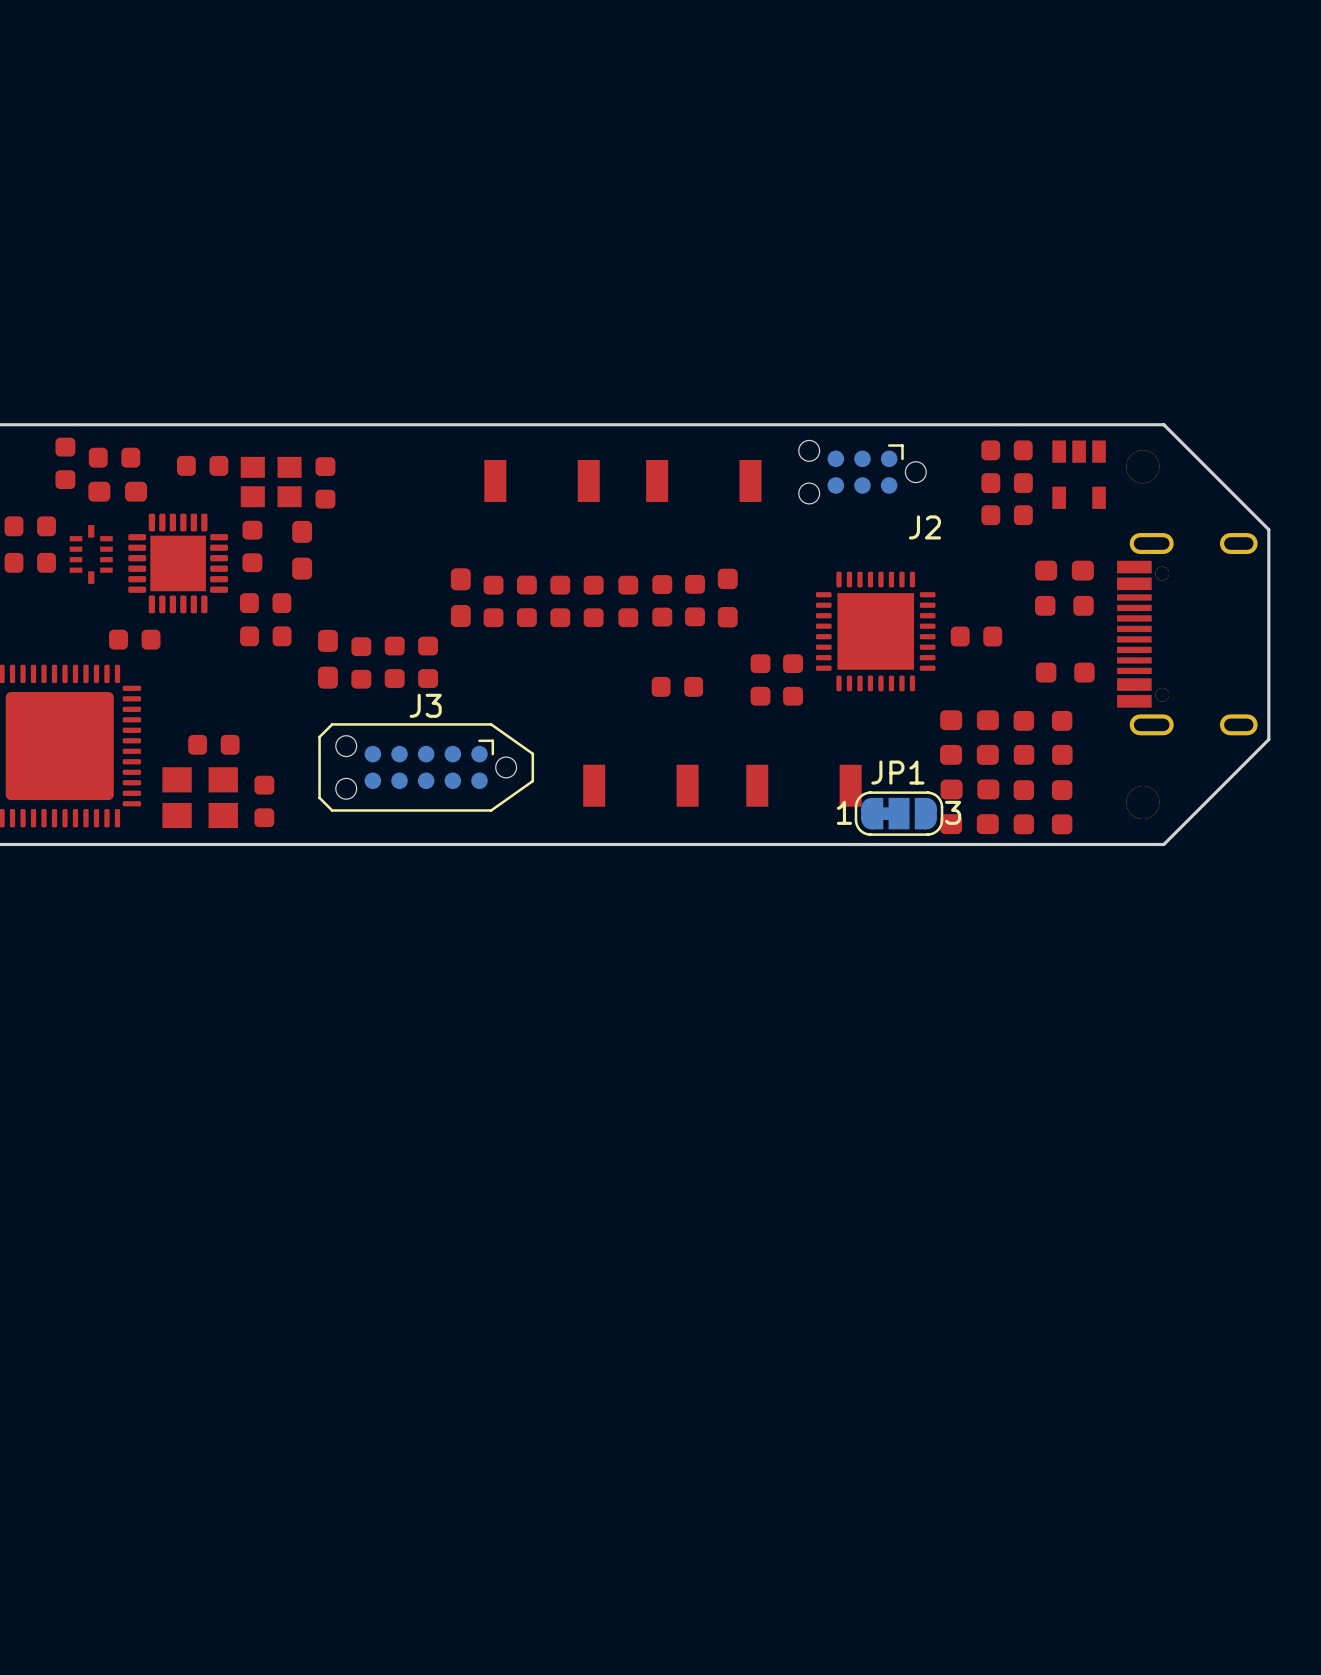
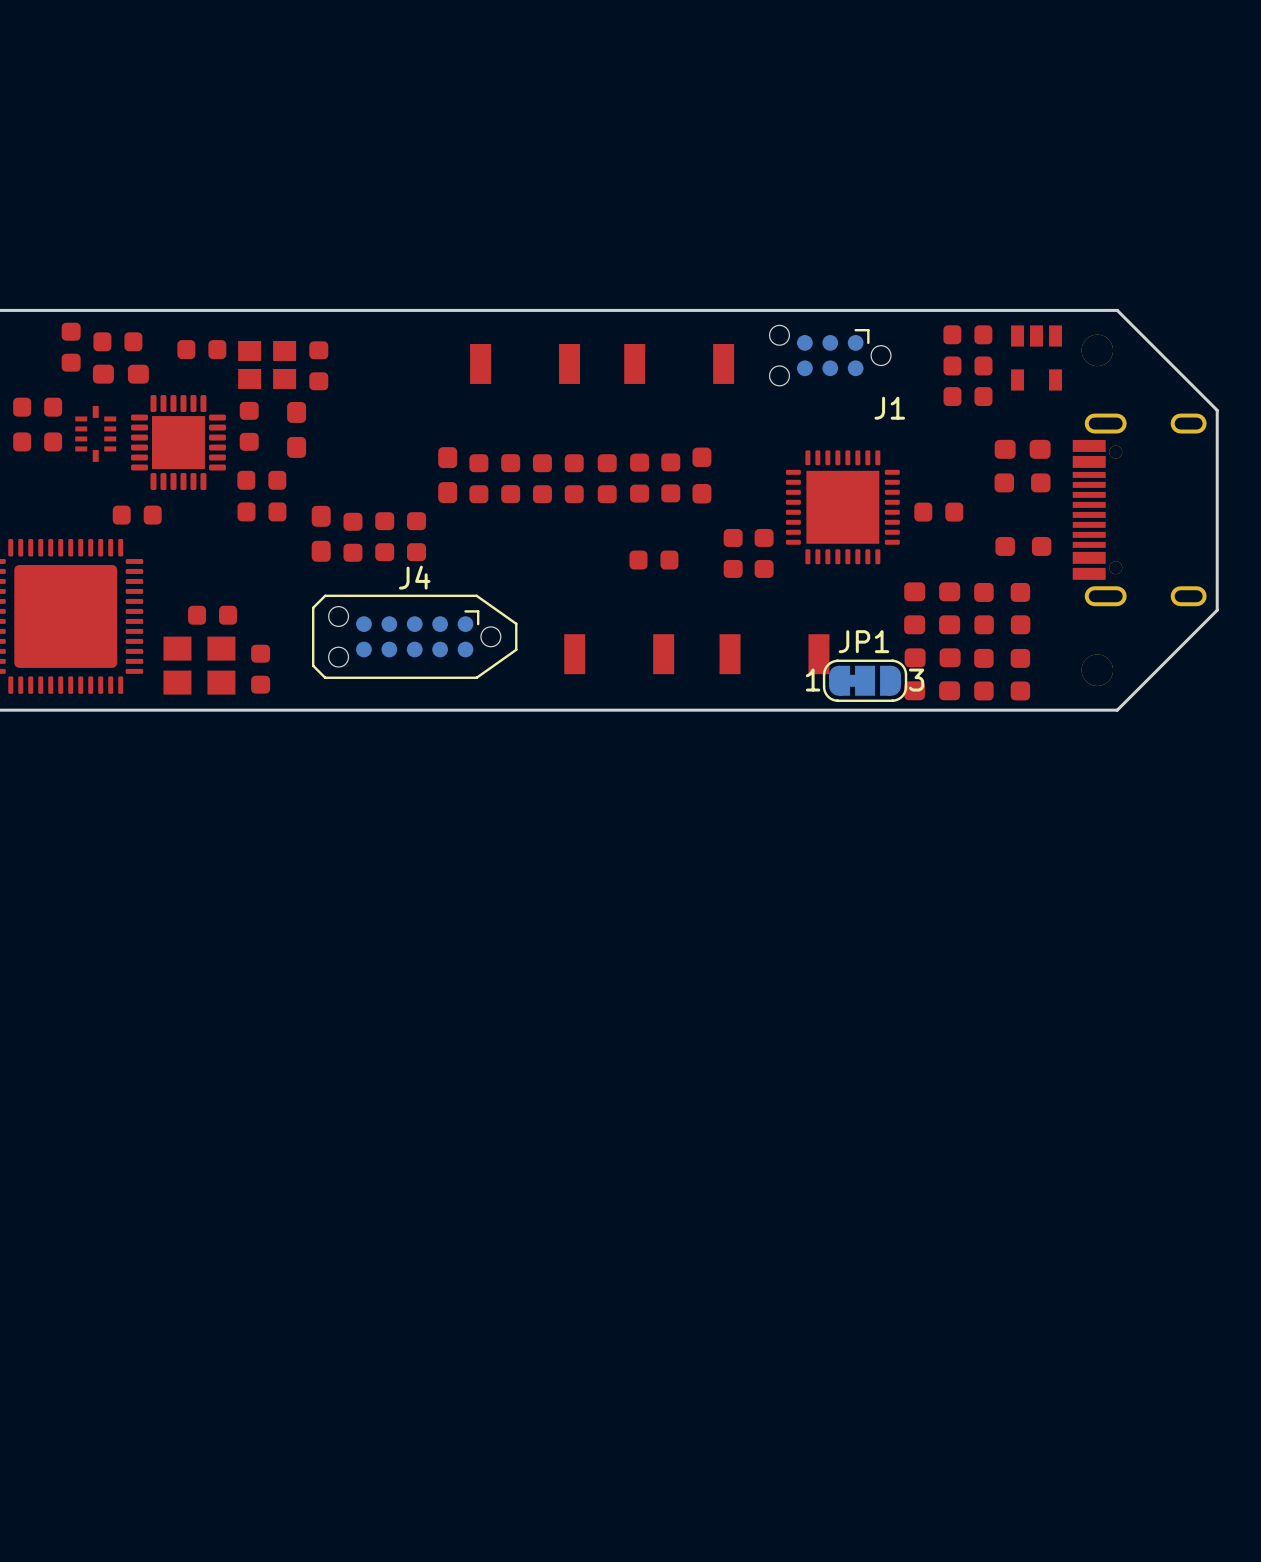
J2 name: J2 (924, 527) -> J1 (889, 408)
J3 name: J3 (425, 705) -> J4 (414, 577)

